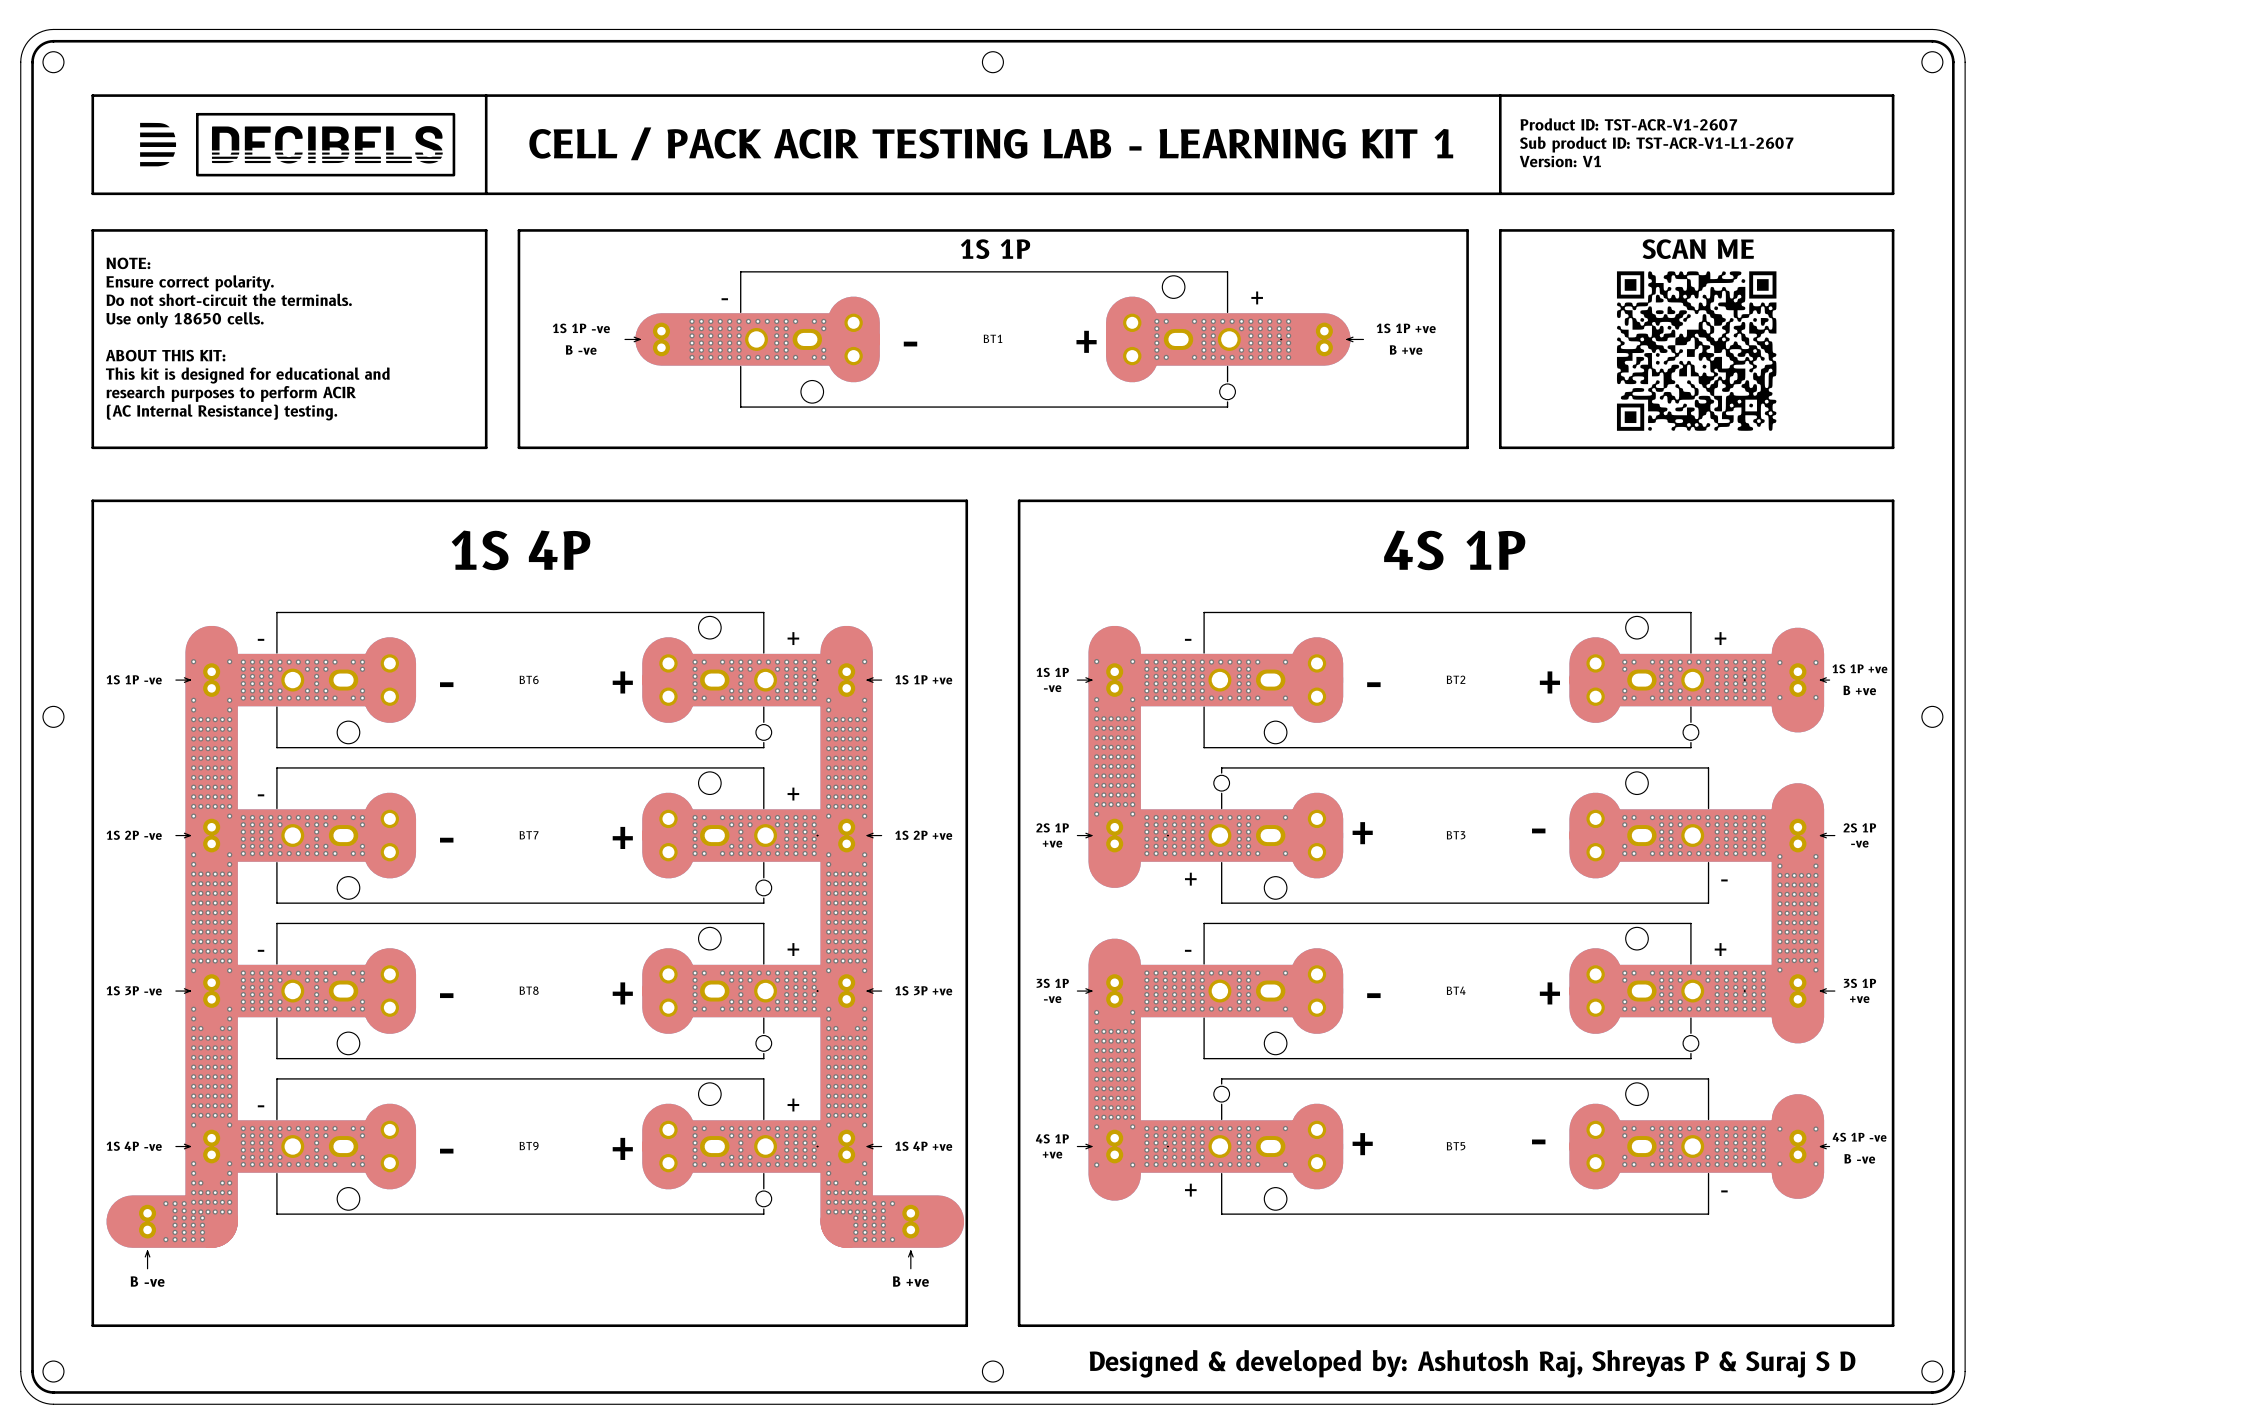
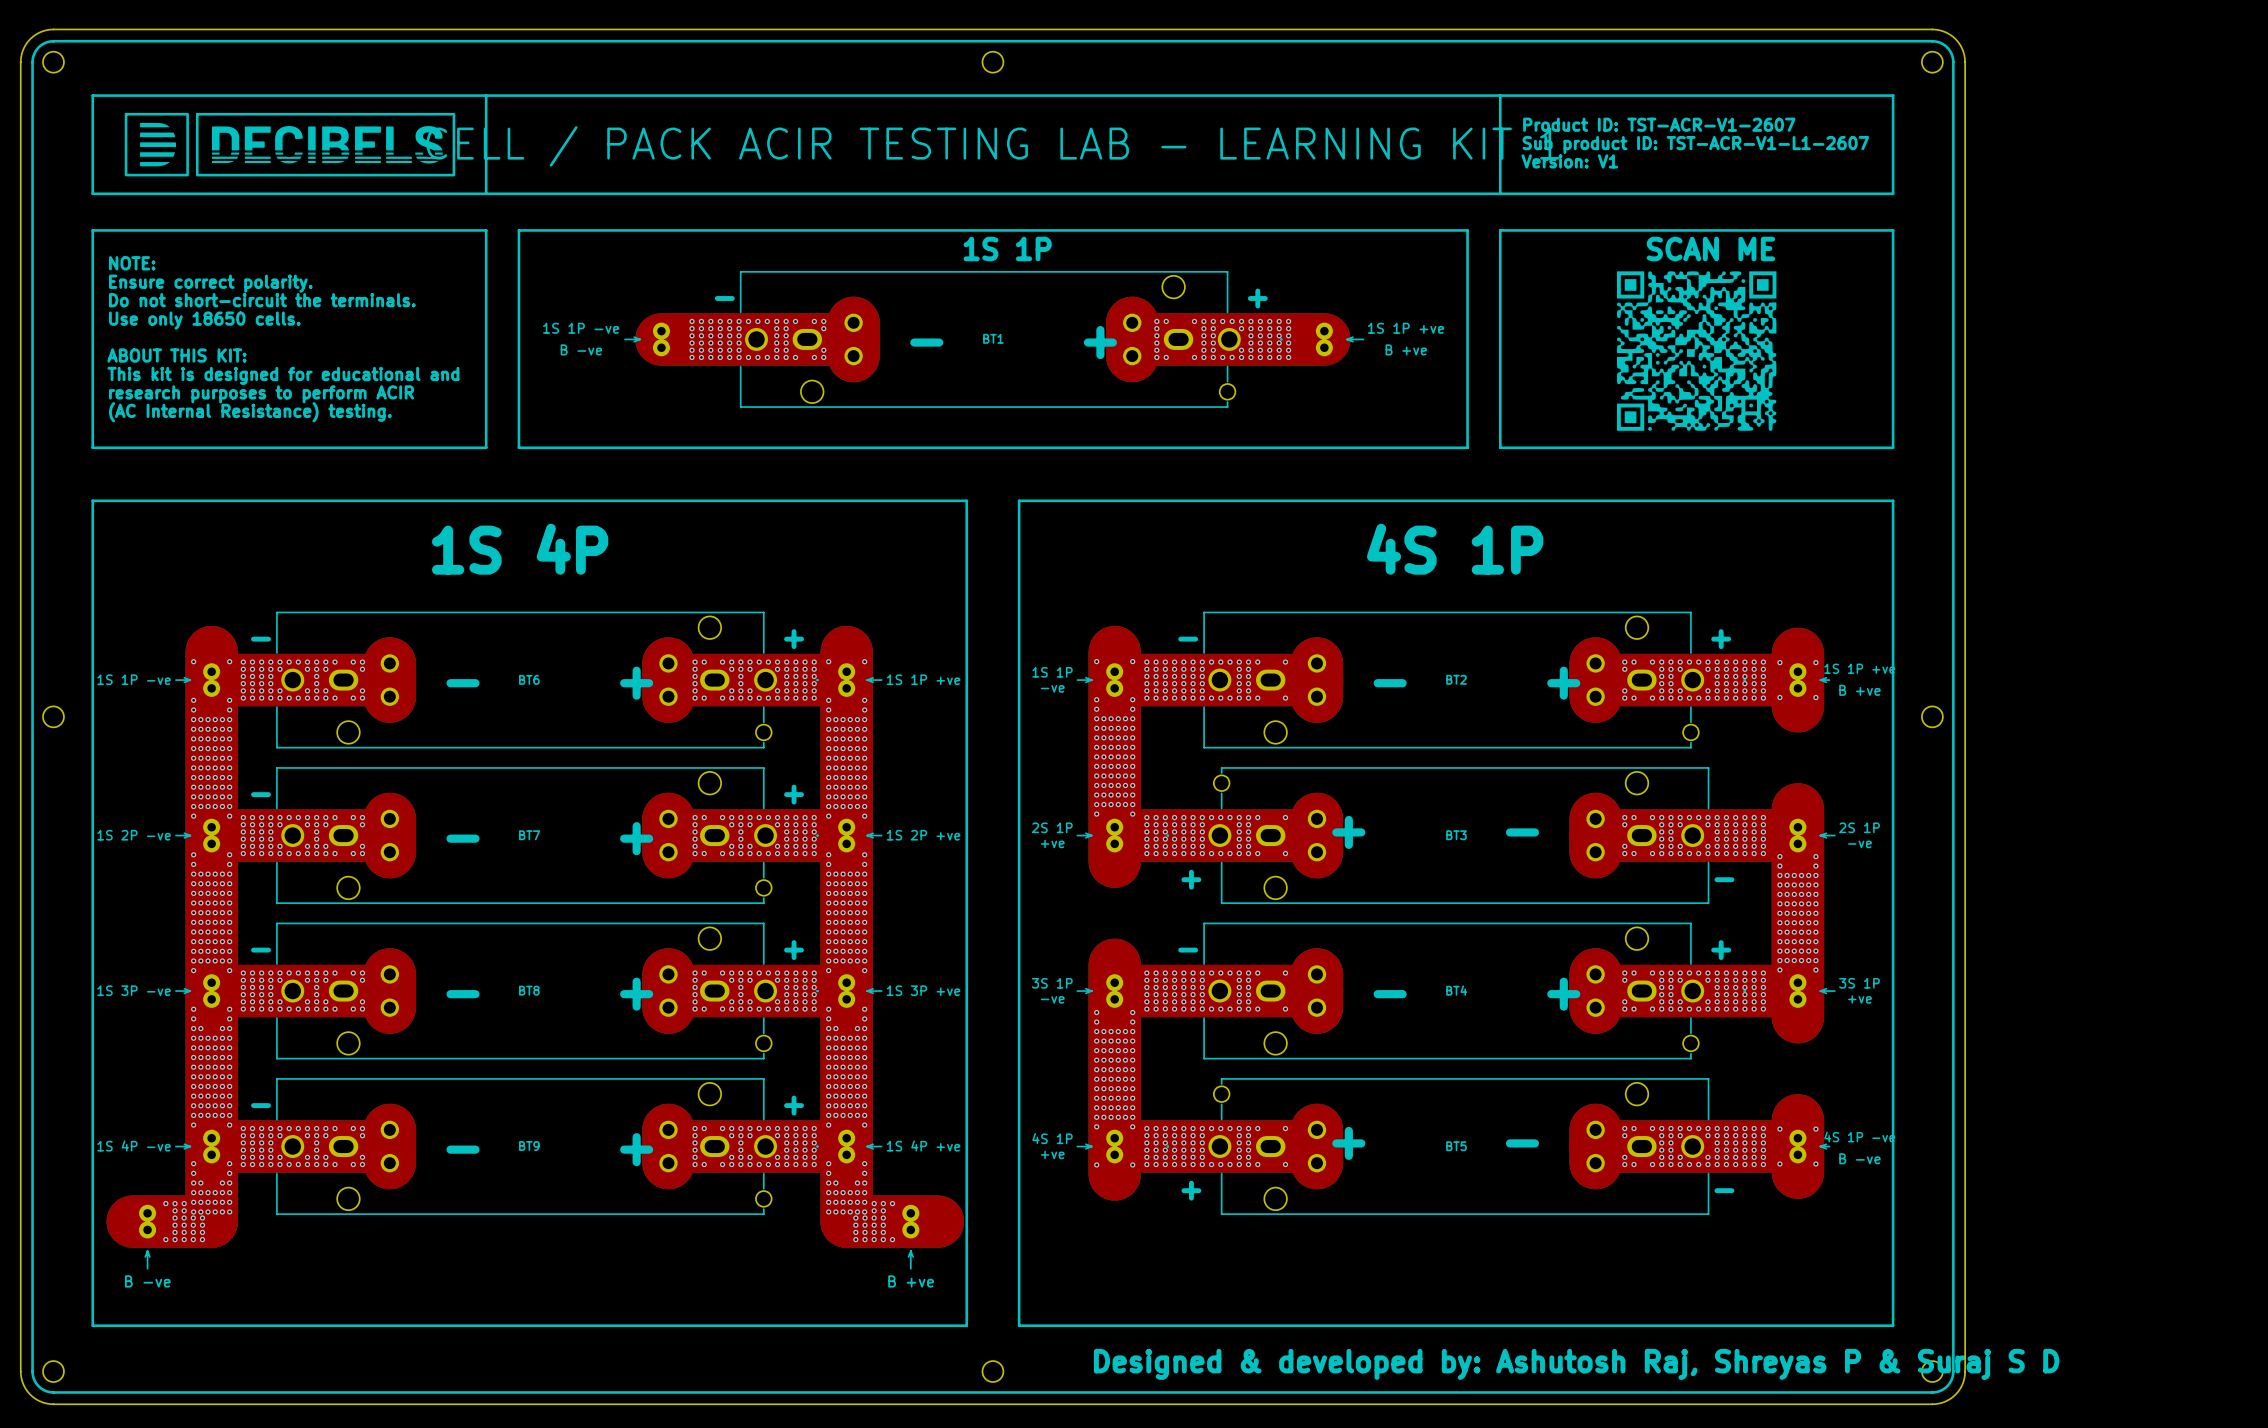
drawing: none -> [124, 112, 456, 177]

